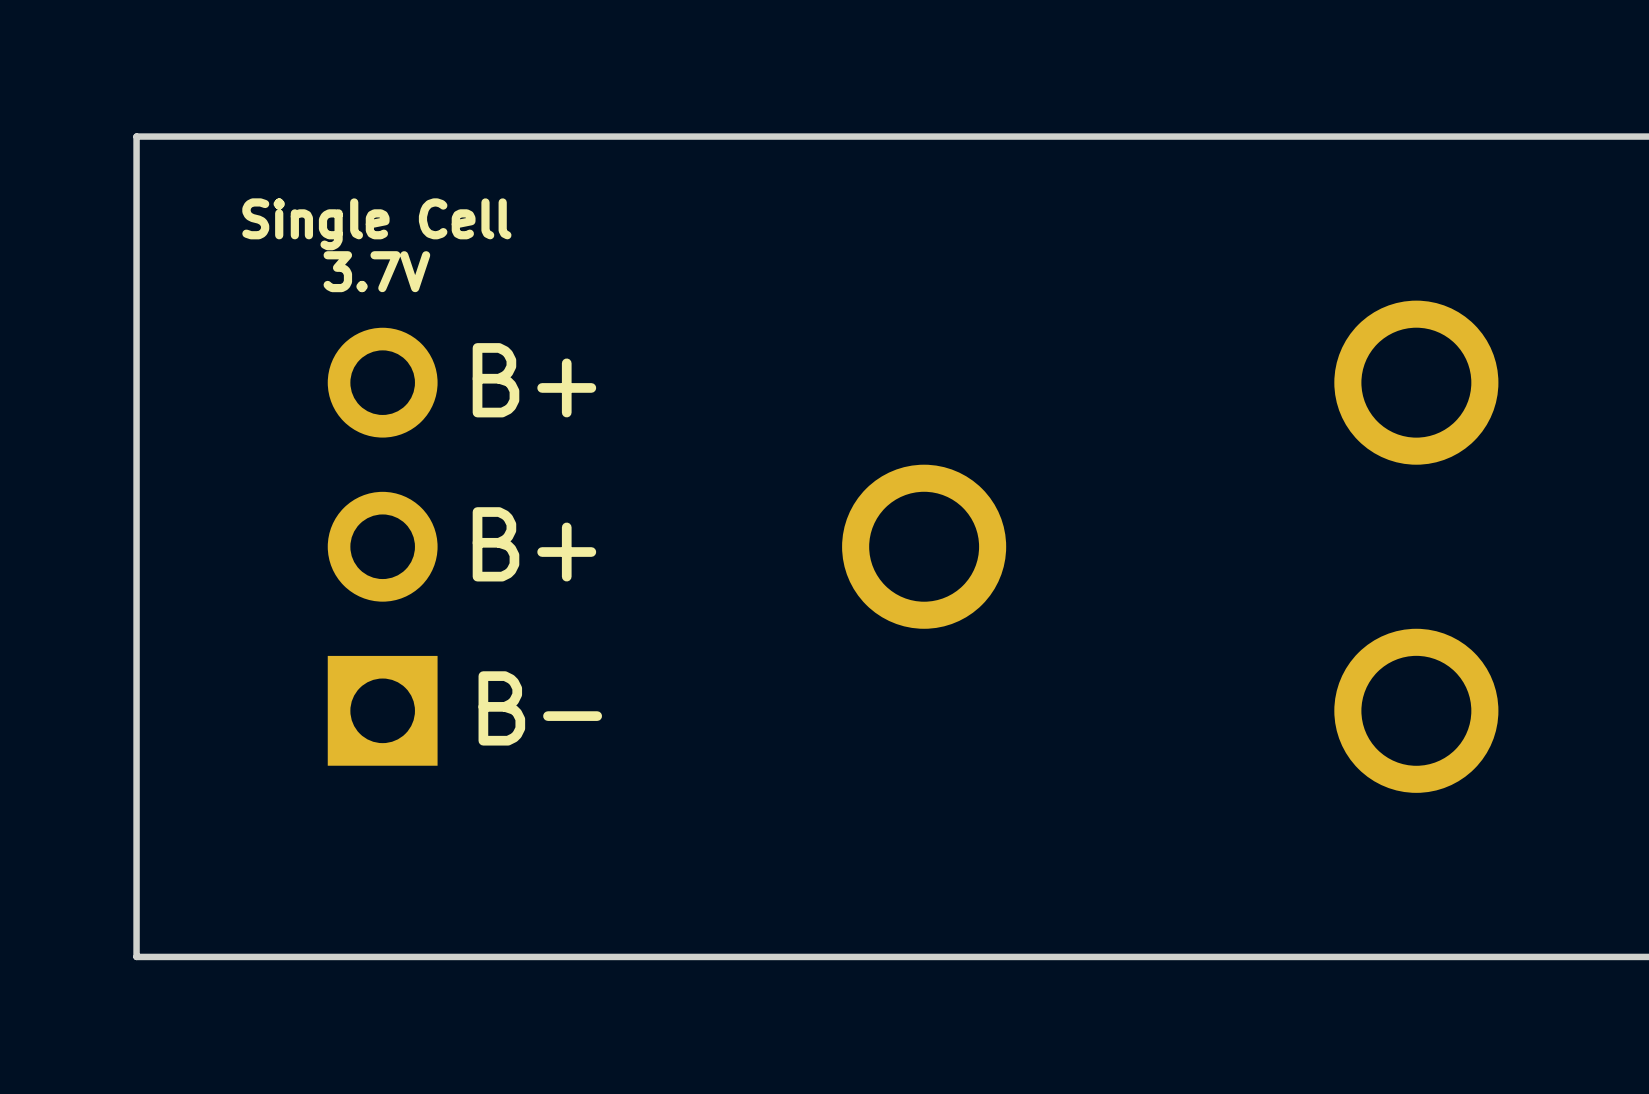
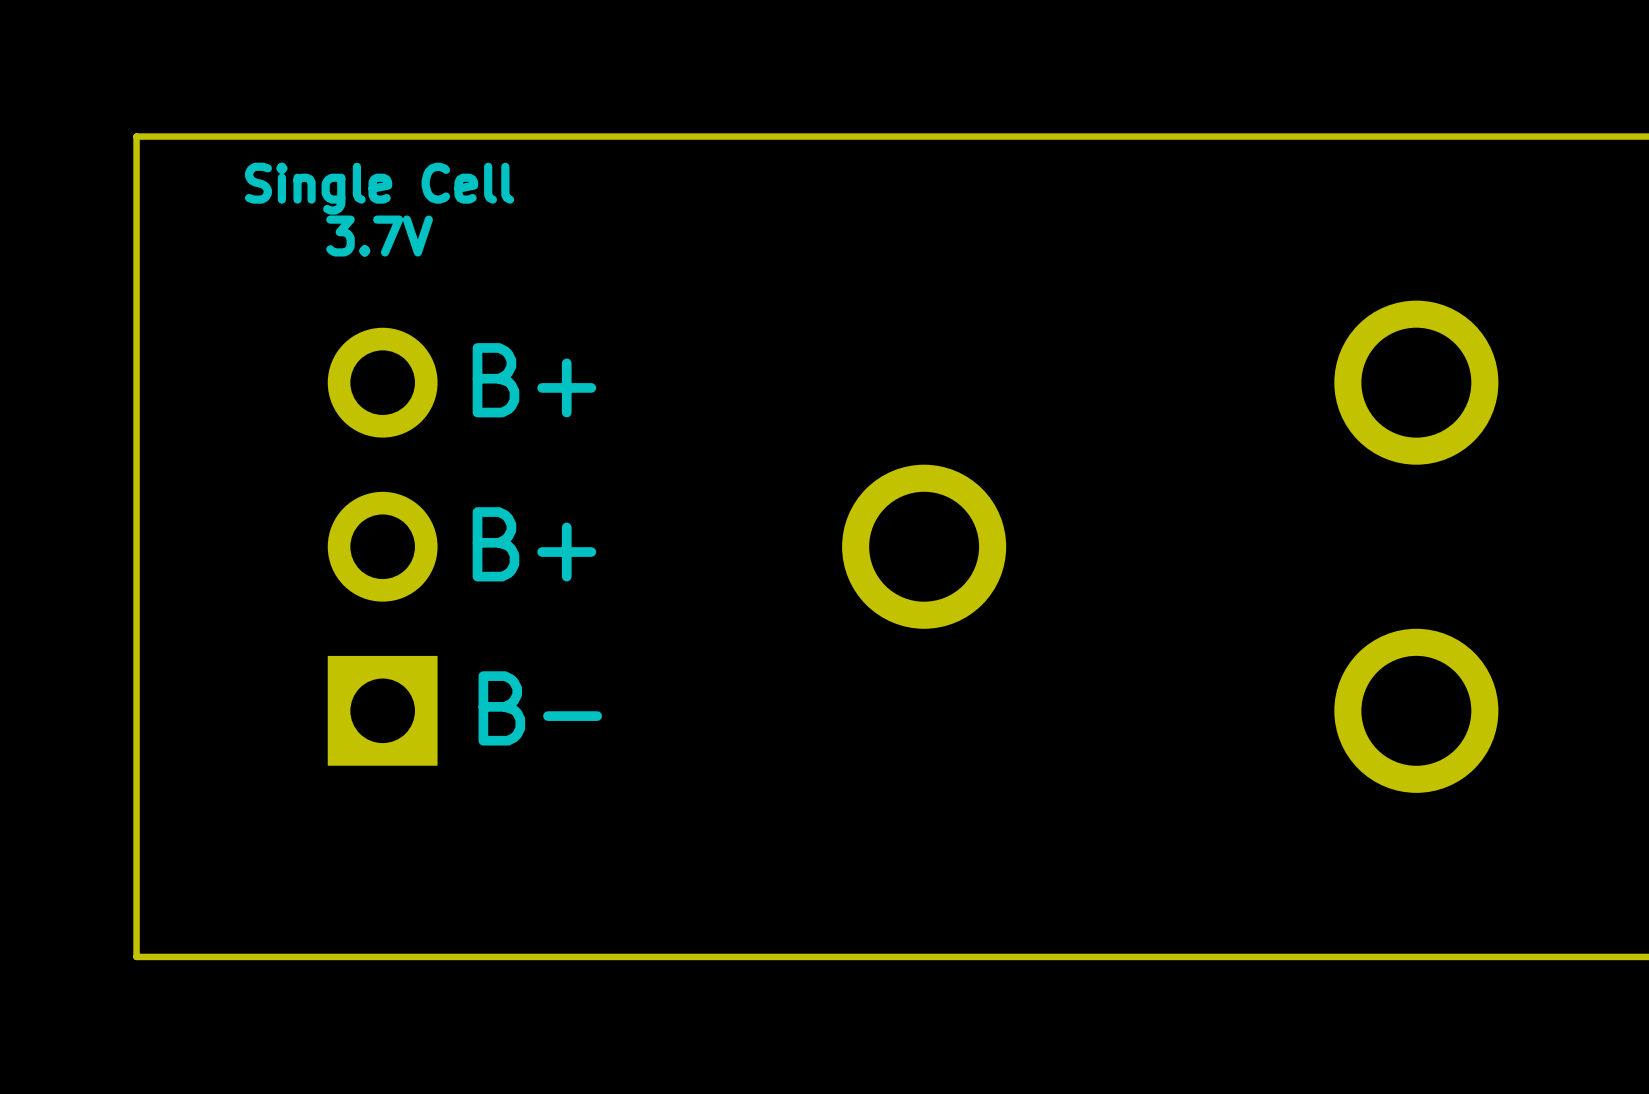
text position: Single Cell (376, 224) -> Single Cell (379, 188)
text position: 3.7V (376, 271) -> 3.7V (379, 236)

